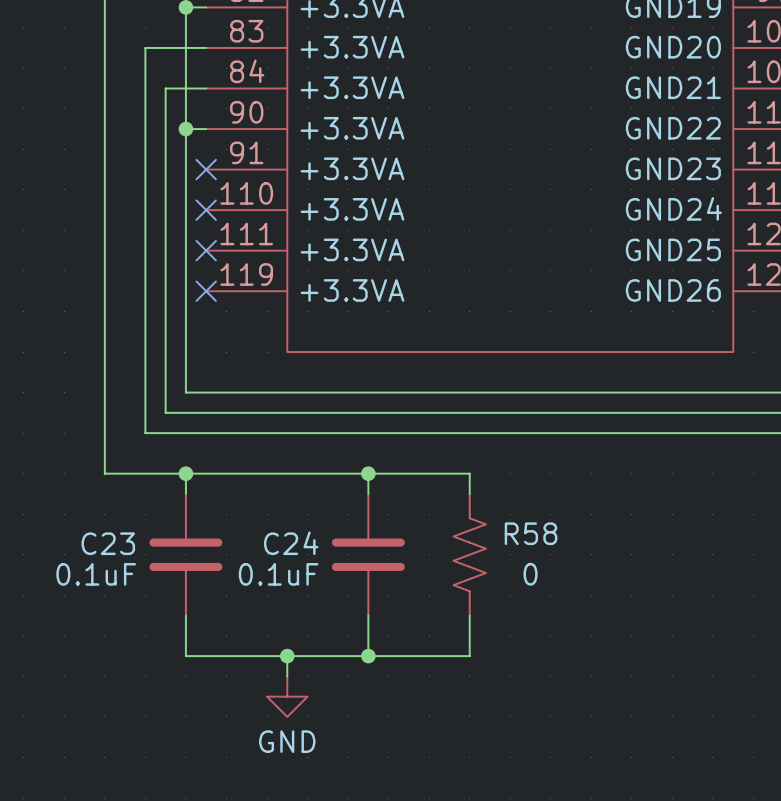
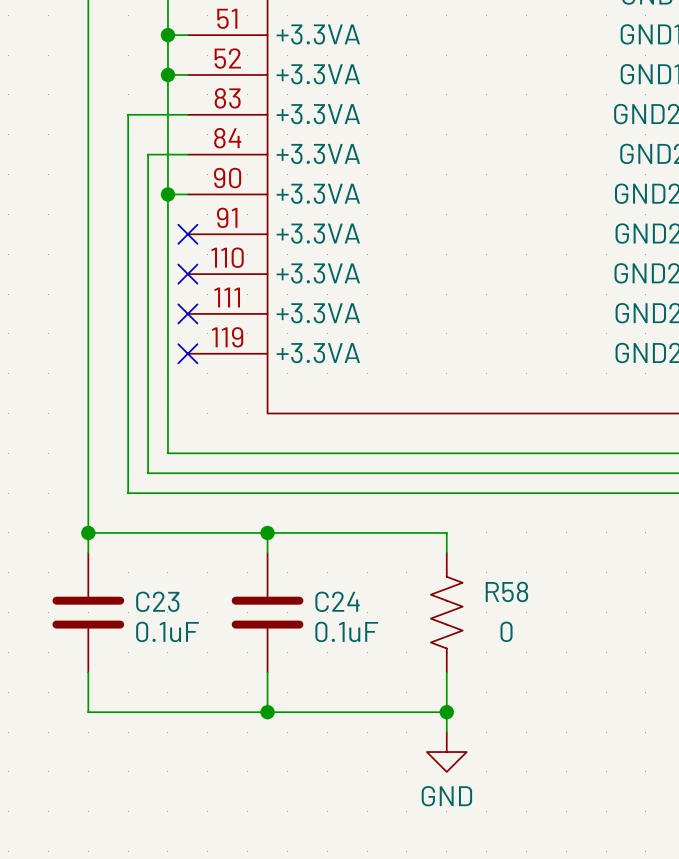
junction: none -> (88, 532)
wire: (185, 473) (185, 493) -> (88, 532) (88, 552)
junction: (185, 473) -> none
junction: none -> (267, 532)
wire: (368, 473) (368, 493) -> (267, 532) (267, 552)
junction: (368, 473) -> none
C23 name position: C23 (108, 543) -> C23 (157, 601)
C24 name position: C24 (291, 543) -> C24 (337, 601)
C23 position: (185, 554) -> (88, 612)
C24 position: (368, 554) -> (267, 612)
C23 value position: 0.1uF (96, 574) -> 0.1uF (167, 631)
C24 value position: 0.1uF (278, 574) -> 0.1uF (346, 631)
wire: (185, 615) (185, 656) -> (88, 672) (88, 712) (167, 712)
wire: (368, 615) (368, 656) -> none
wire: (287, 656) (287, 676) -> (267, 712) (267, 672)
junction: (368, 656) -> none
wire: none -> (446, 712) (446, 732)
junction: none -> (446, 712)
power symbol position: GND (287, 696) -> GND (446, 752)

